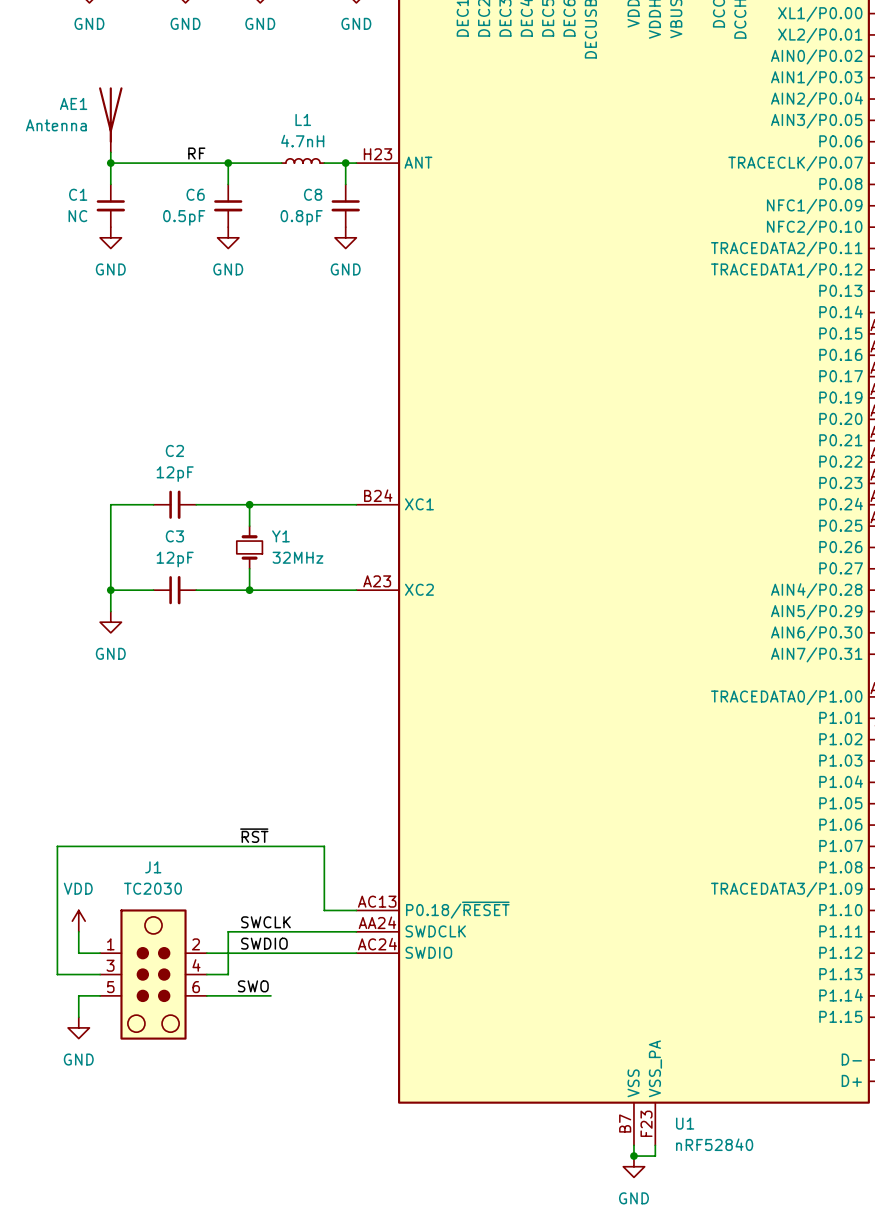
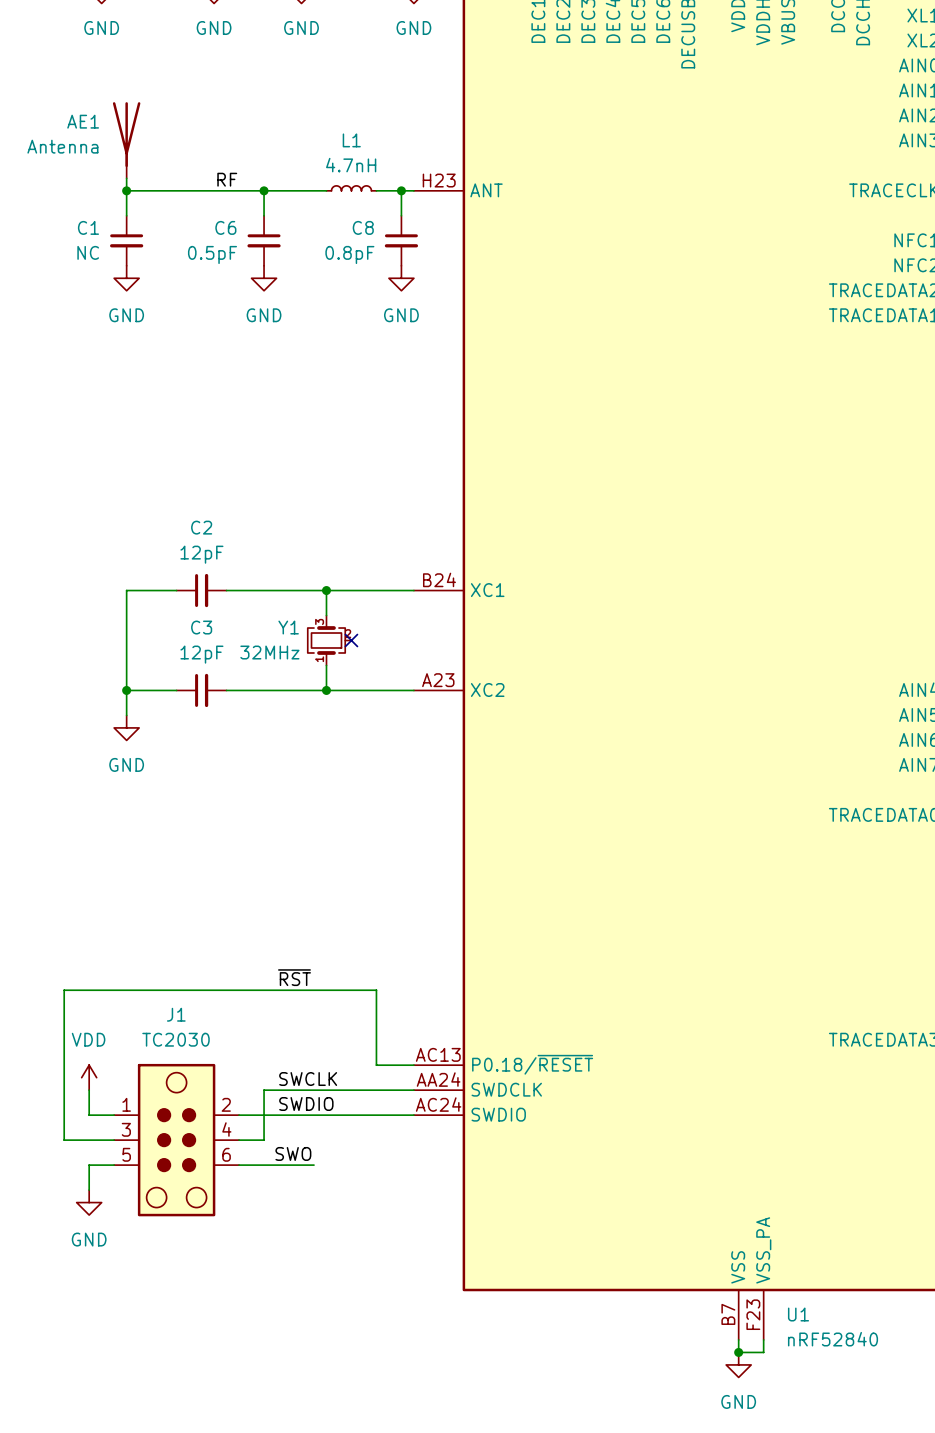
wire: (249, 504) (249, 526) -> (326, 590) (326, 615)
junction position: (249, 504) -> (326, 590)
Y1 symbol: [236, 526, 263, 569] -> [307, 615, 352, 666]
Y1 name position: Y1 (280, 536) -> Y1 (288, 627)
no-connect mark: none -> (351, 640)
Y1 value position: 32MHz (297, 557) -> 32MHz (269, 652)
wire: (249, 568) (249, 590) -> (326, 665) (326, 690)
junction position: (249, 590) -> (326, 690)

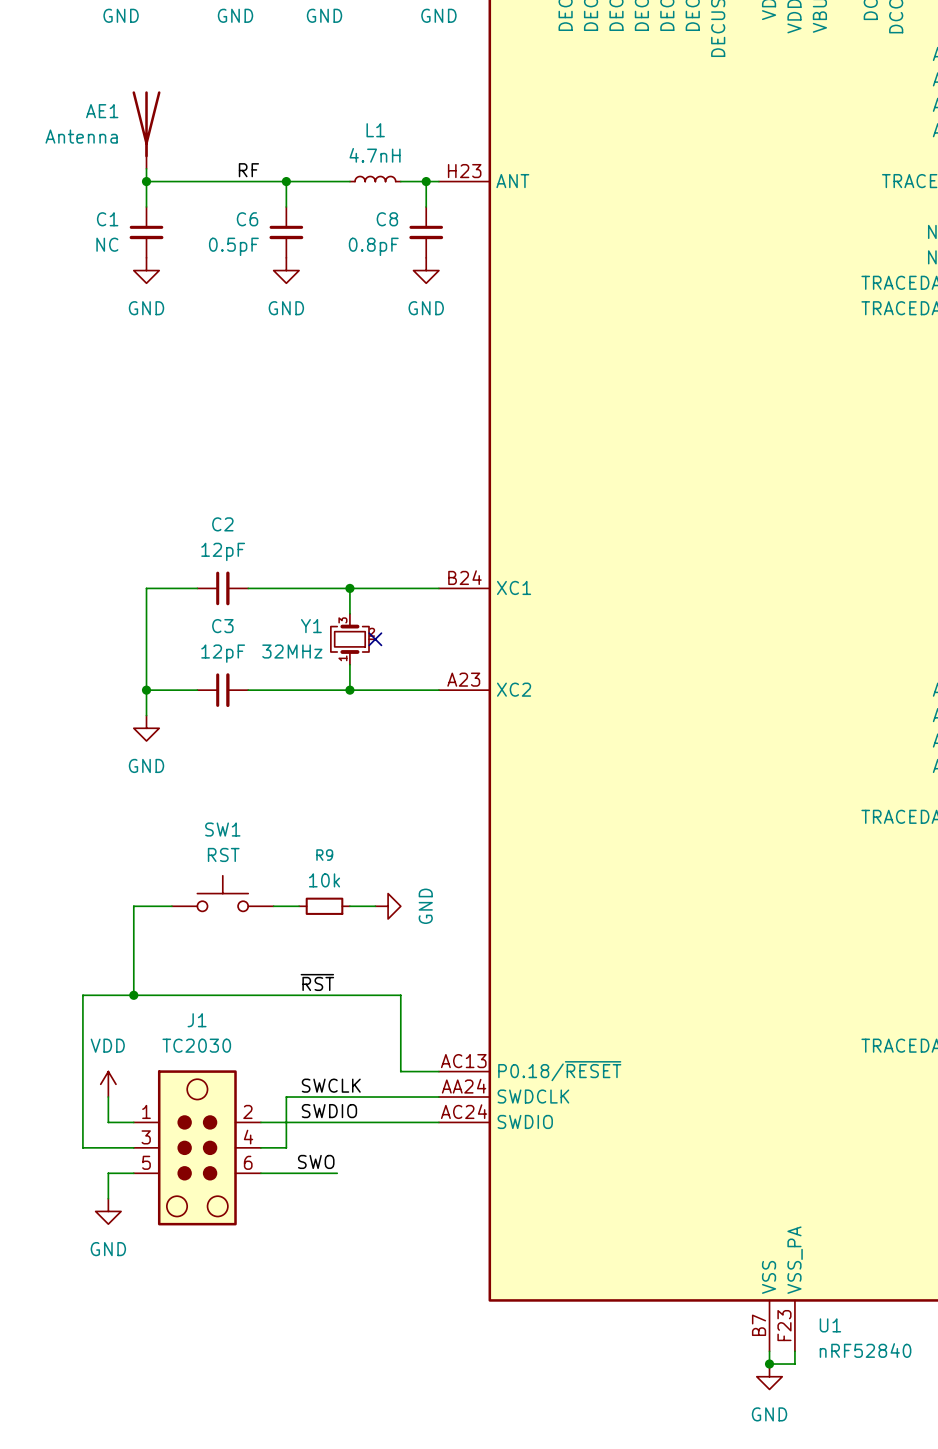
SW1: none -> RST (222, 893)
wire: none -> (171, 906) (133, 906) (133, 995)
wire: none -> (273, 906) (299, 906)
R9: none -> 10k (324, 906)
wire: none -> (349, 906) (375, 906)
power symbol: none -> GND (388, 906)
junction: none -> (133, 995)

